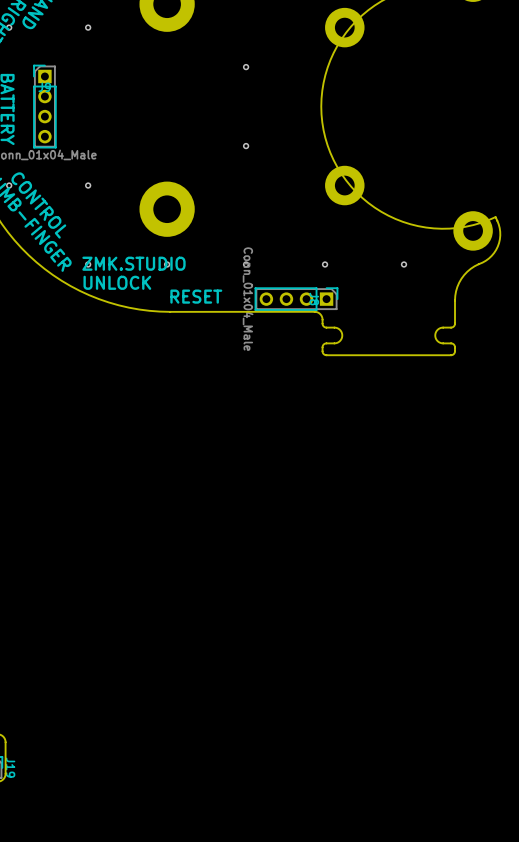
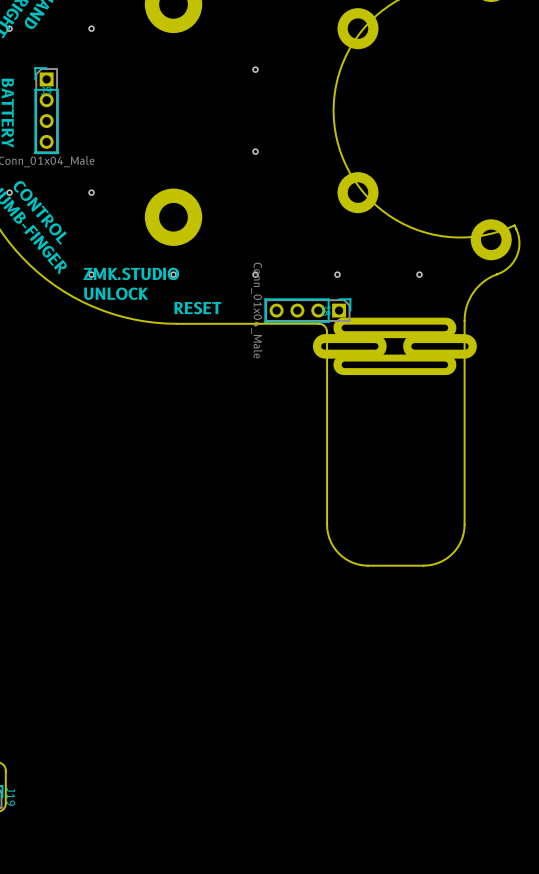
board edge: (478, 264) (467, 271) (457, 286) (454, 325) (440, 328) (435, 333) (438, 341) (454, 344) (454, 352) (452, 355) (325, 355) (322, 352) (323, 344) (338, 341) (342, 337) (341, 332) (337, 328) (324, 326) (322, 317) (318, 313) (307, 311) -> (497, 274) (488, 278) (476, 288) (468, 301) (464, 315) (463, 533) (458, 546) (452, 553) (445, 559) (432, 564) (358, 564) (342, 556) (331, 542) (327, 524) (327, 331) (324, 326) (318, 323)
part: none -> (394, 346)

